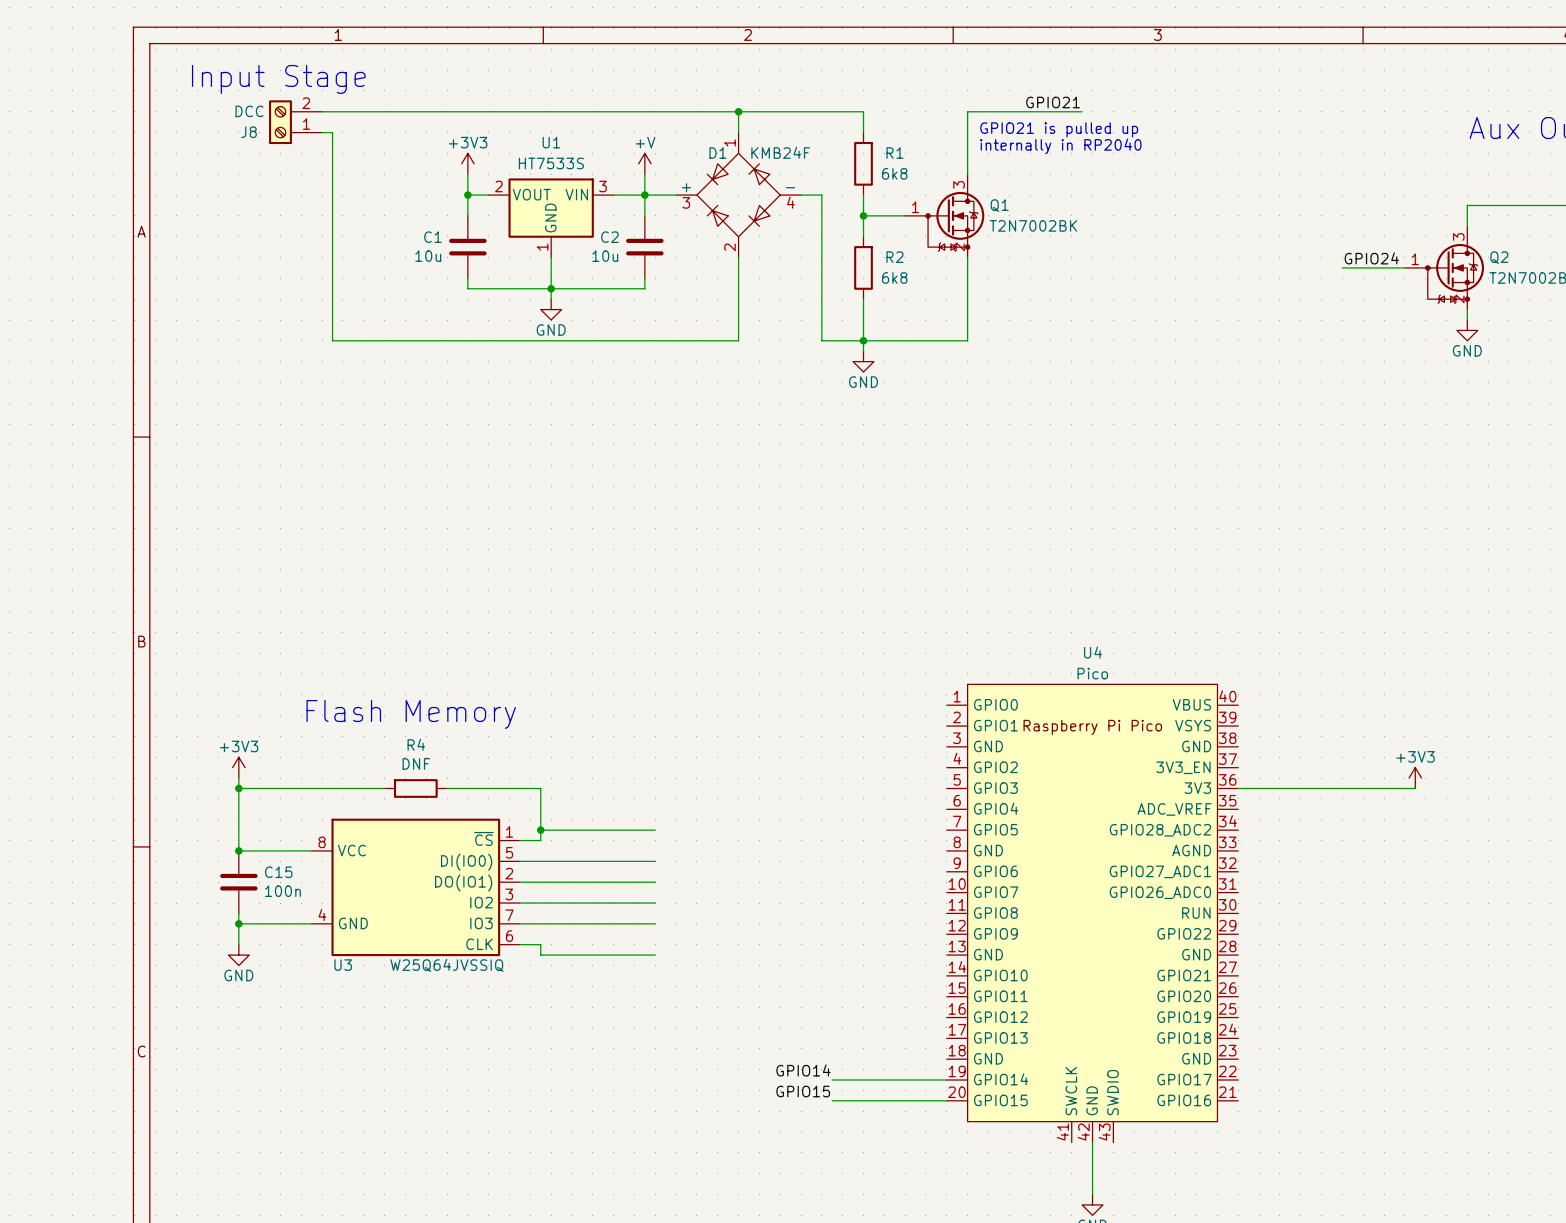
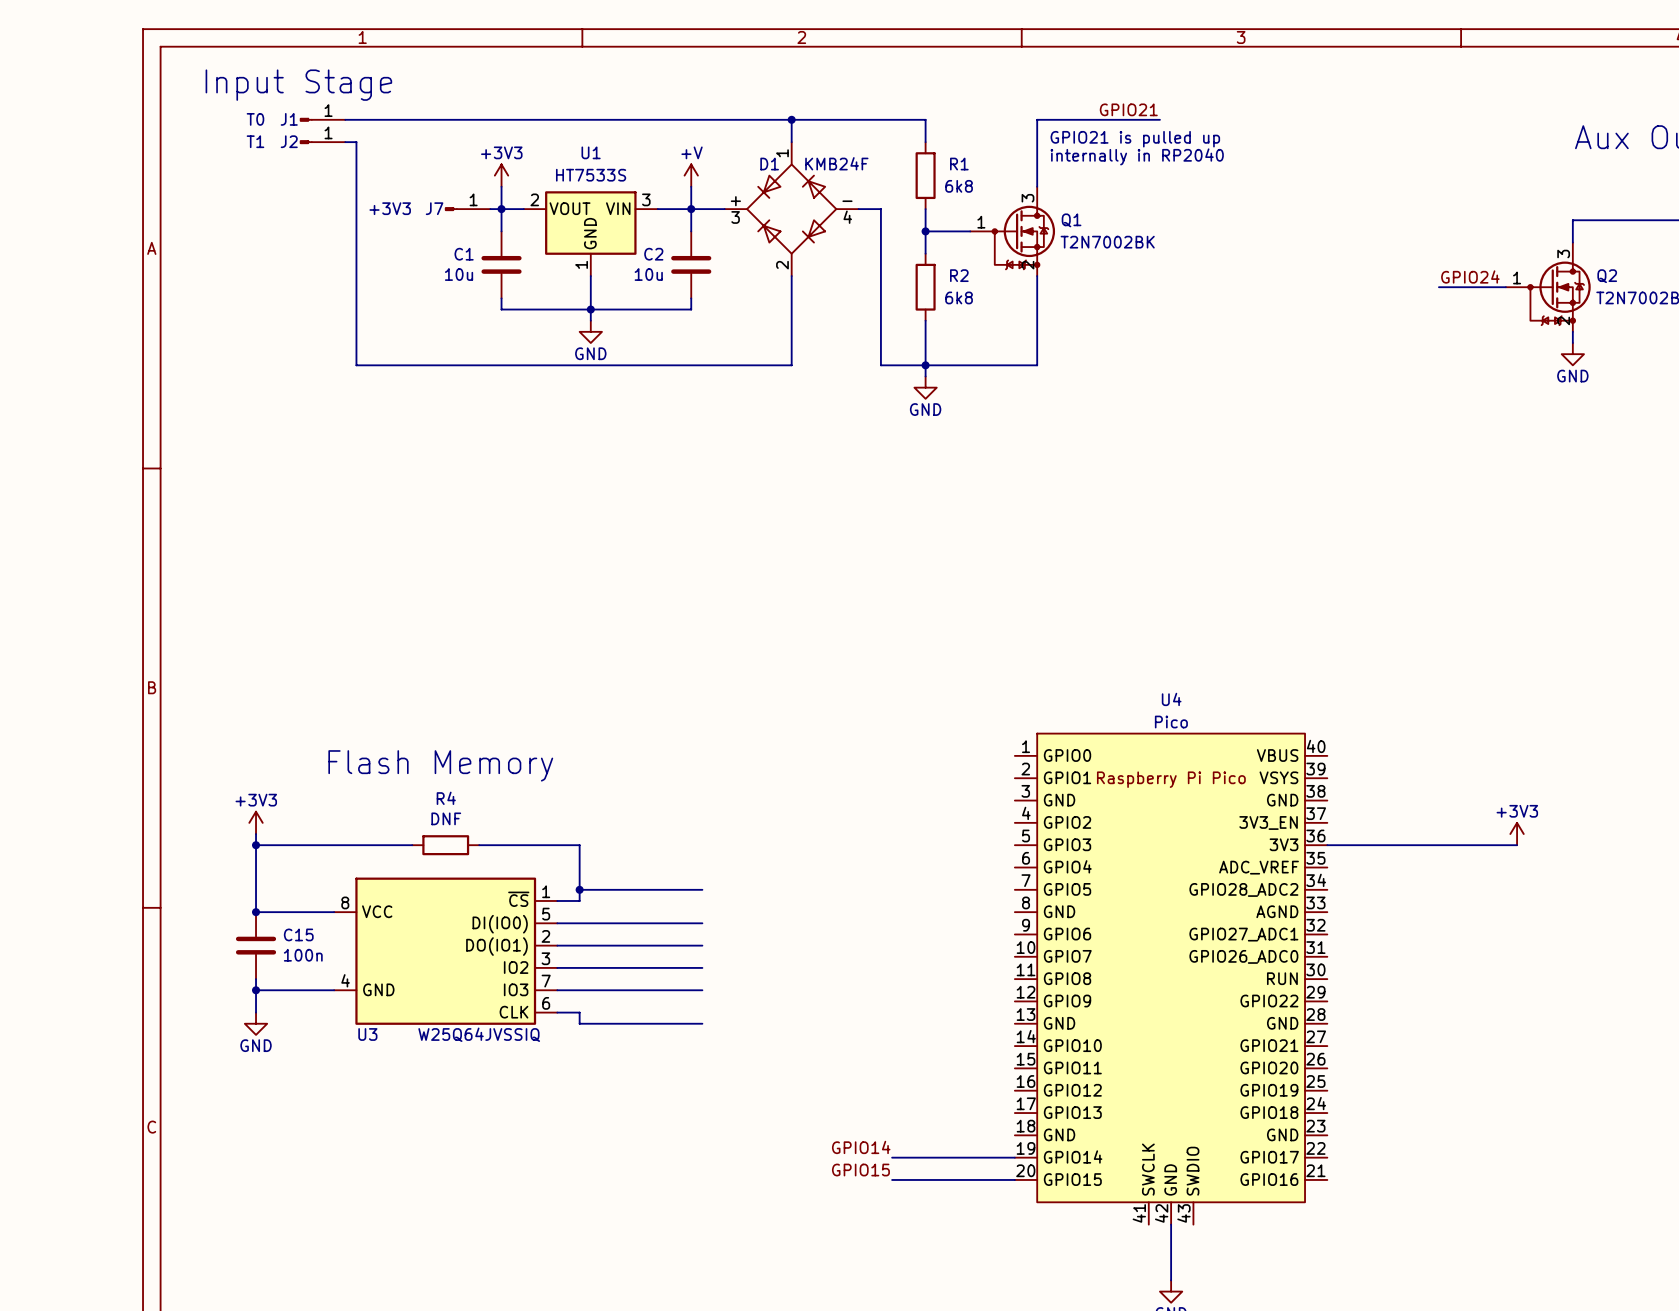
J1: none -> T0 (322, 119)
J8: DCC (295, 122) -> none
J2: none -> T1 (322, 142)
J7: none -> +3V3 (467, 209)
wire: none -> (490, 209) (501, 209)

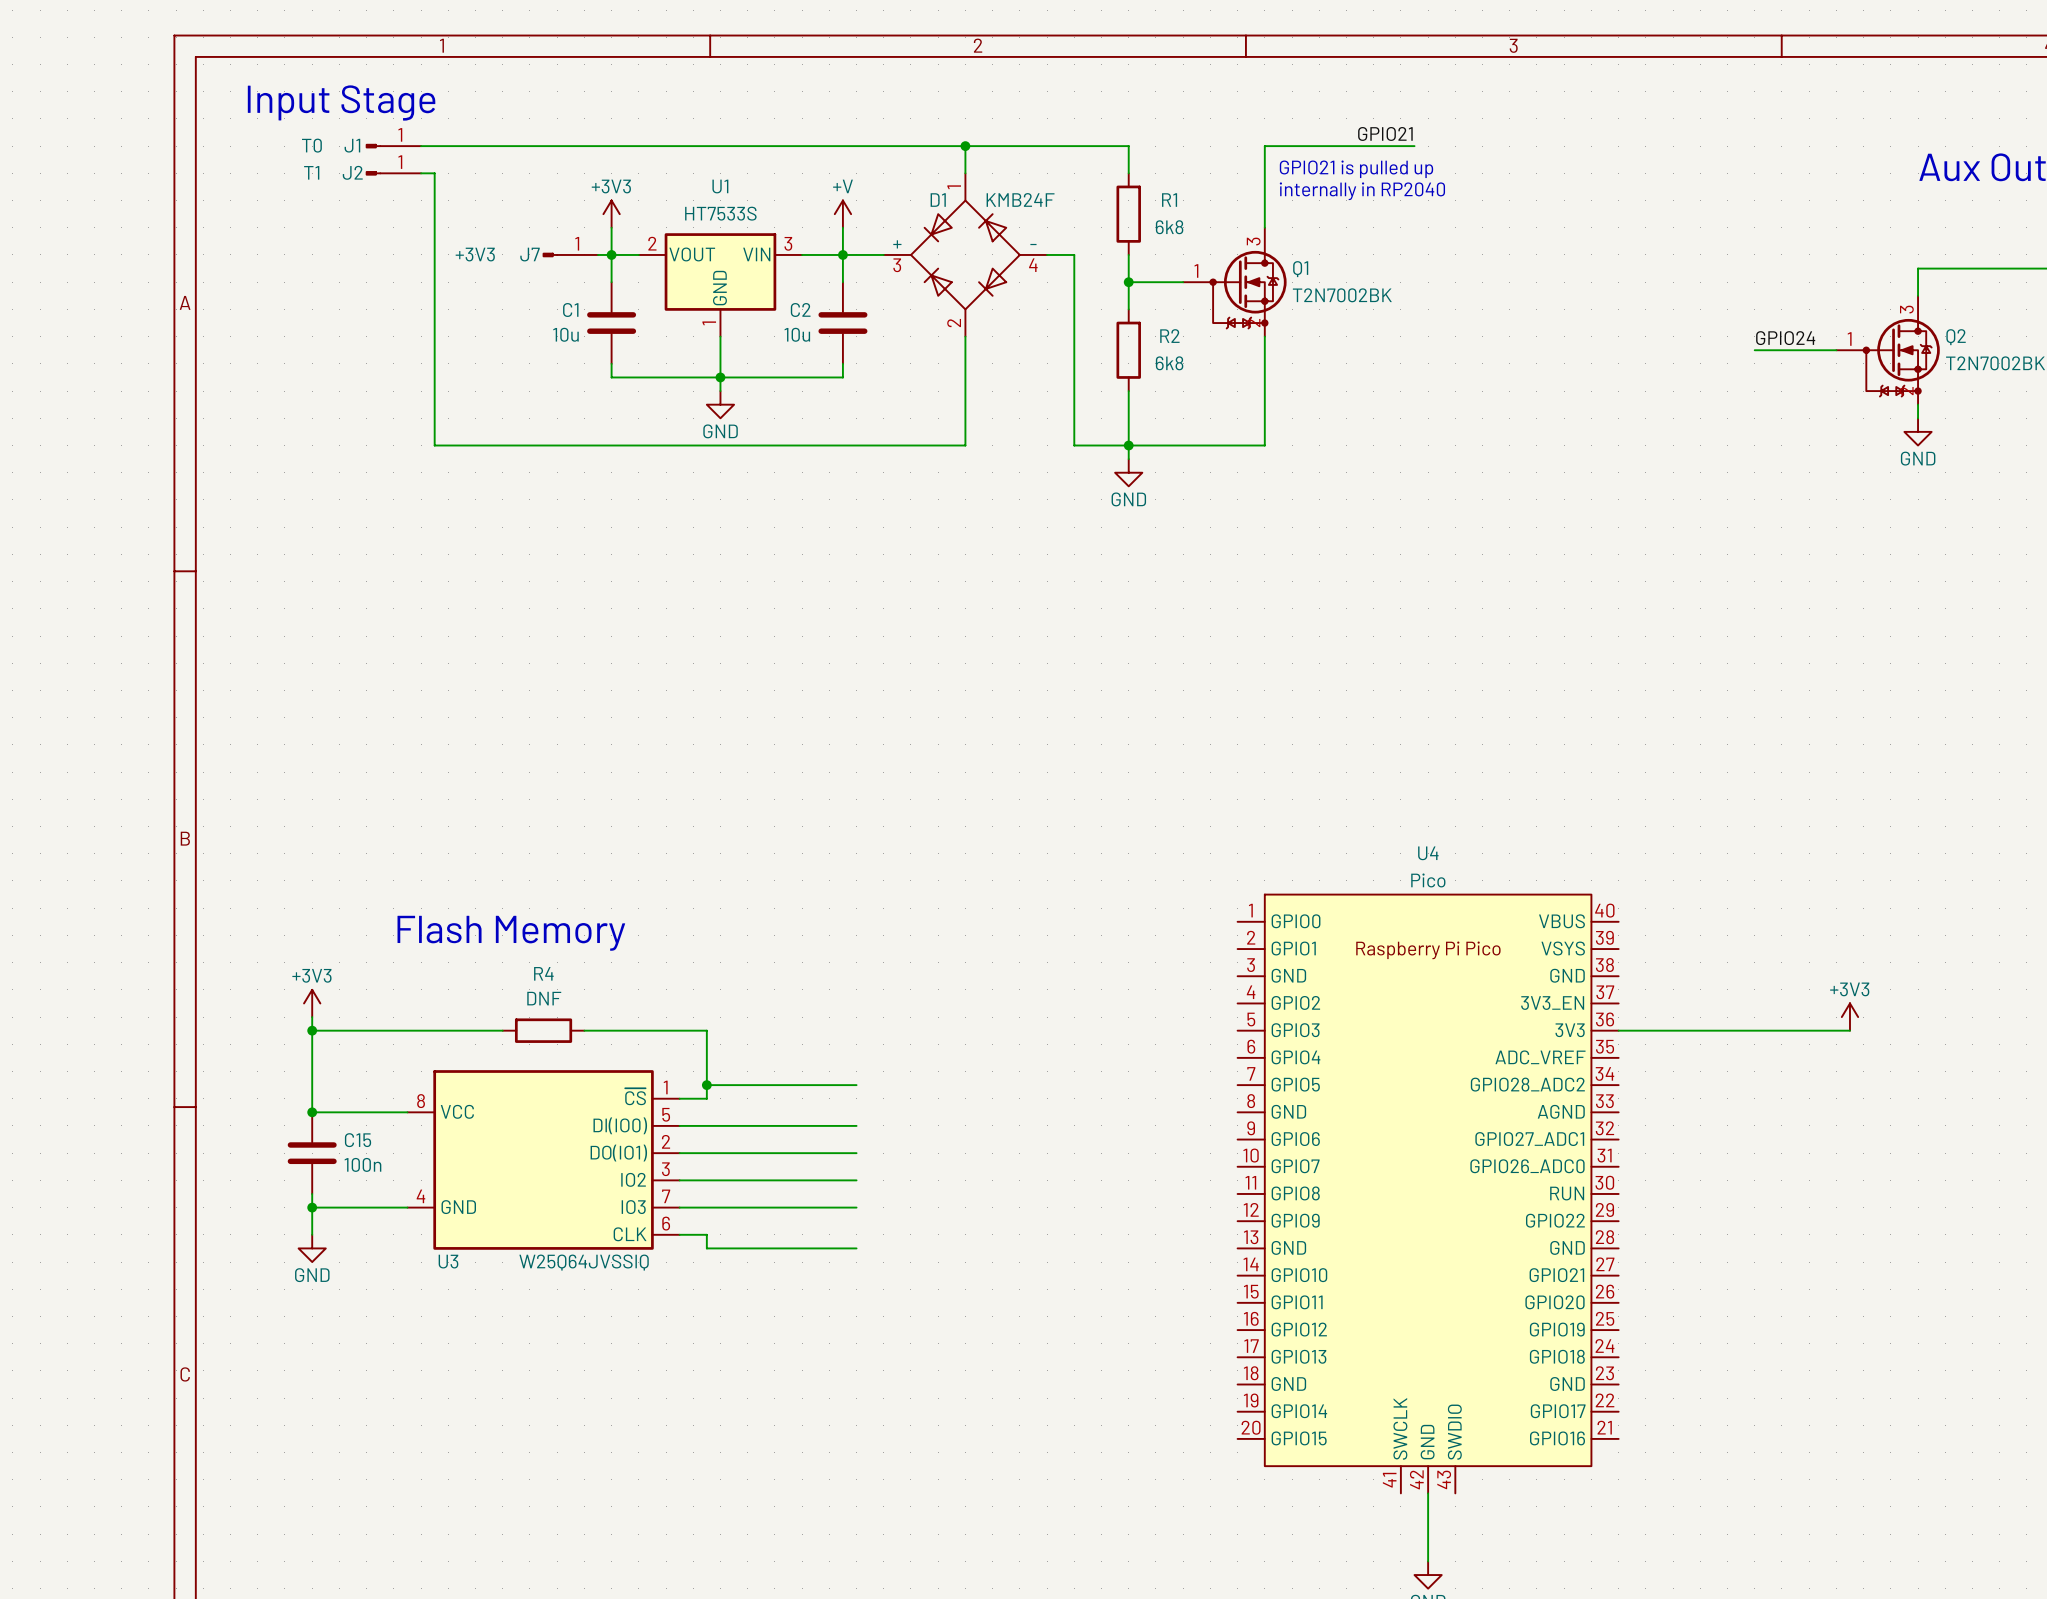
label: GPIO14 (861, 1147) -> none
wire: (892, 1157) (1014, 1157) -> none
label: GPIO15 (860, 1170) -> none
wire: (892, 1179) (1014, 1179) -> none

